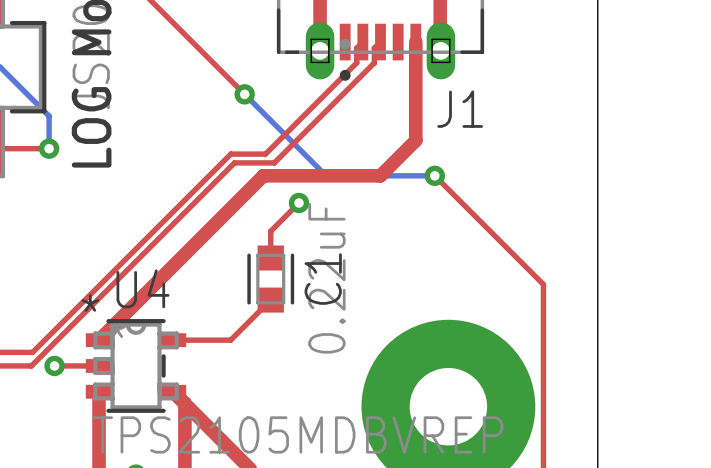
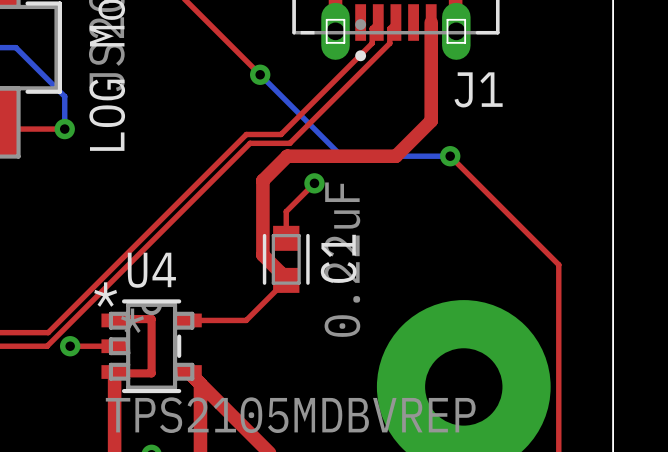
top track: (271, 175) (263, 175) (100, 338) -> (287, 156) (262, 180) (262, 255) (281, 273) (281, 285)
top track: none -> (115, 319) (151, 319) (151, 373) (114, 372)

